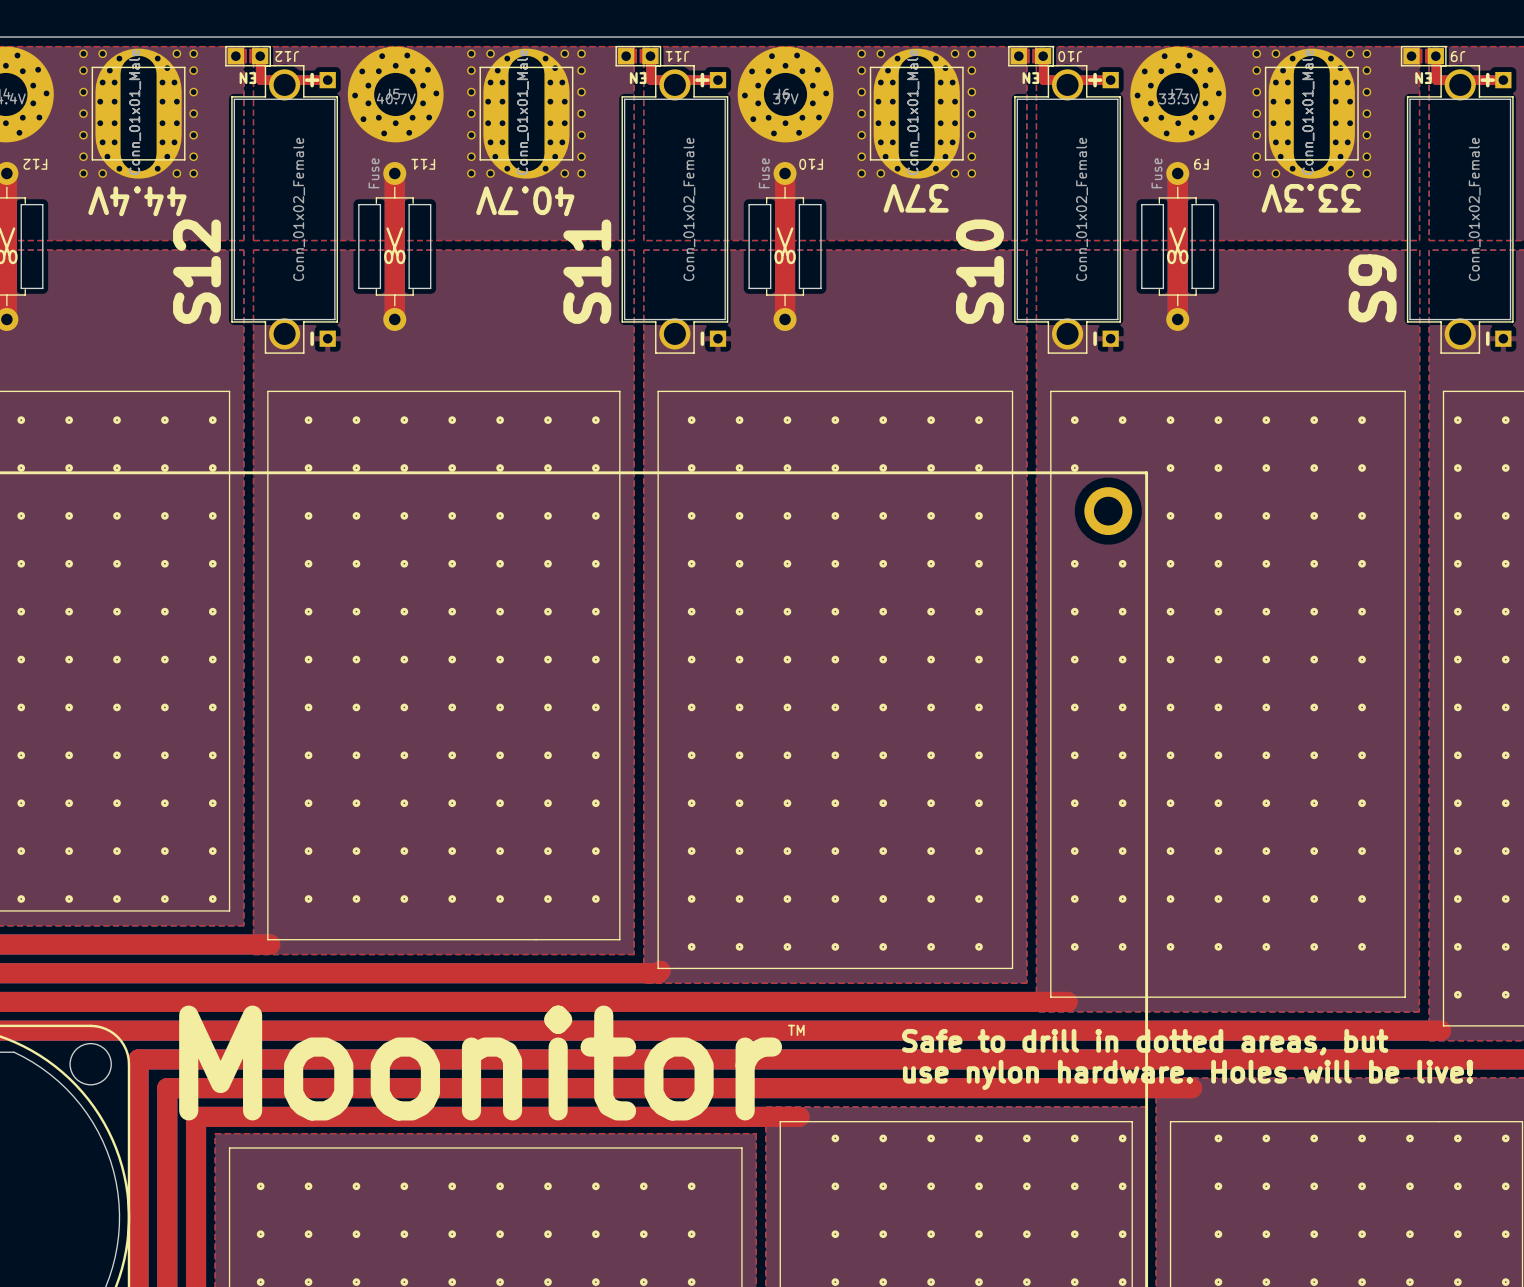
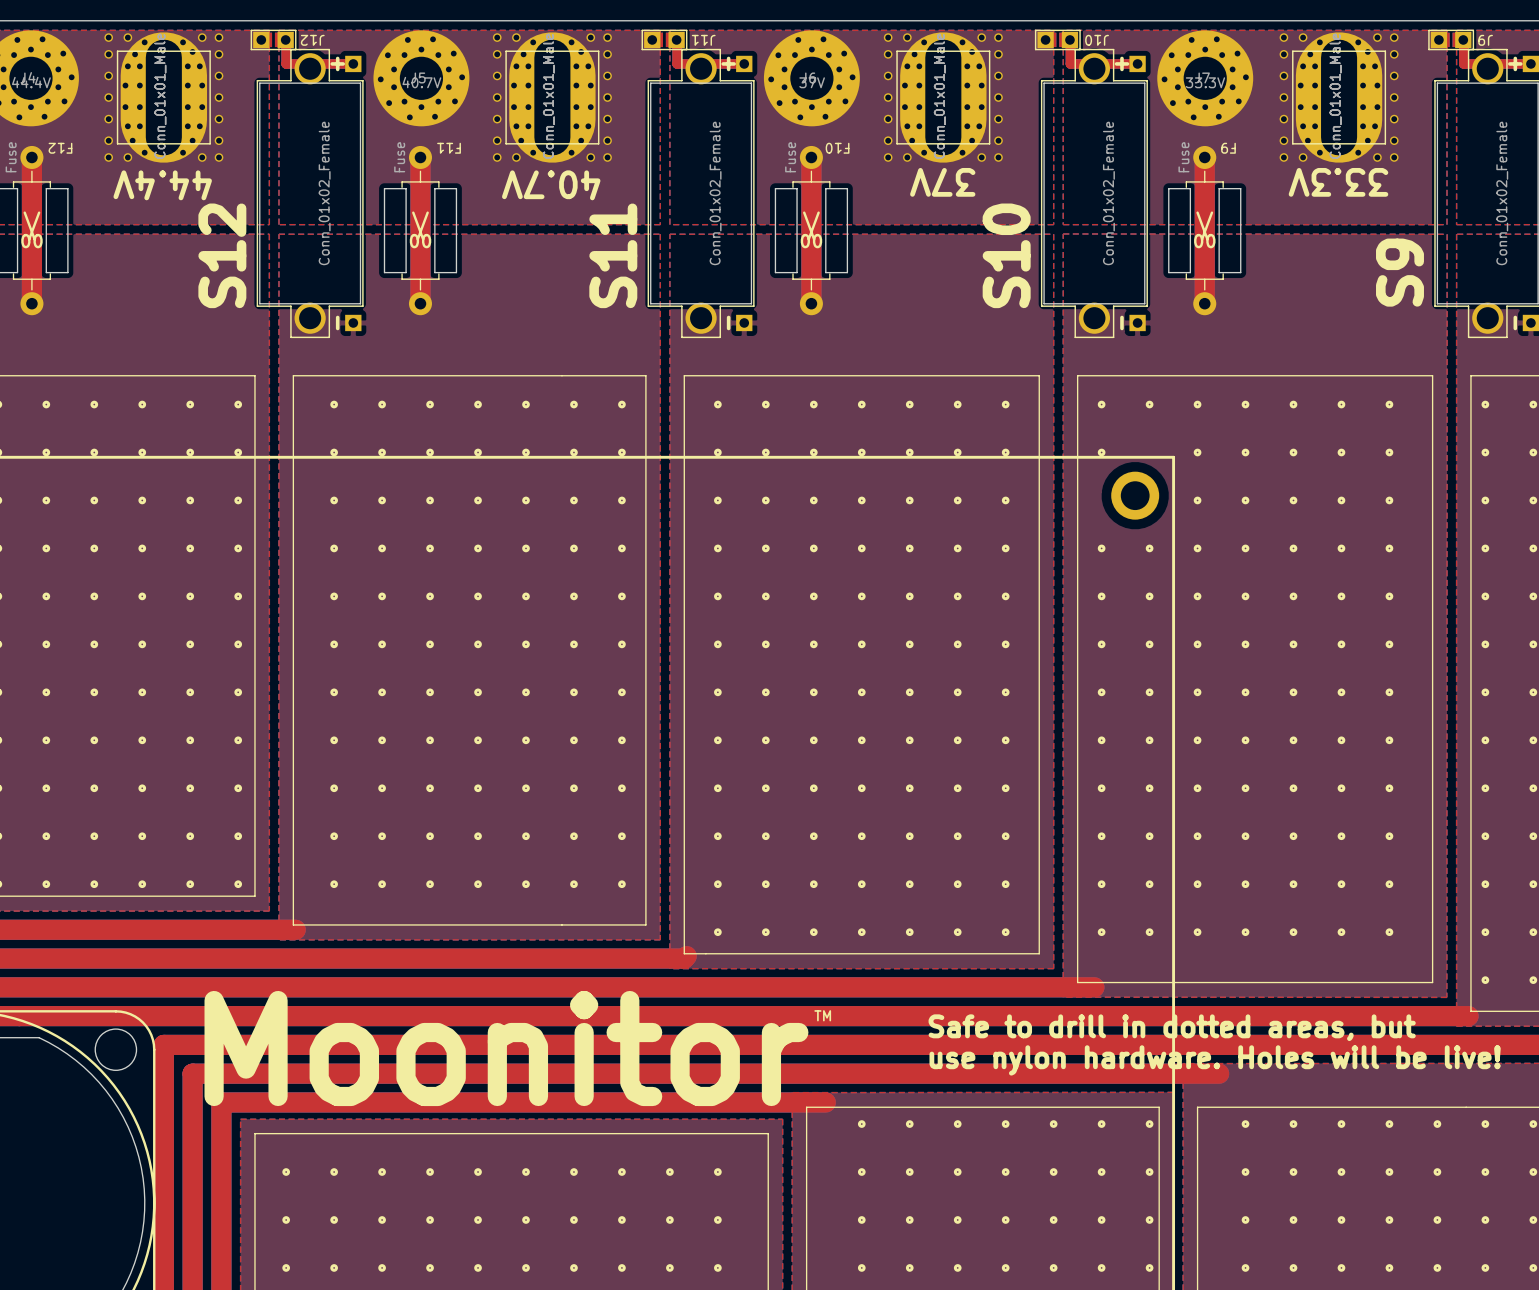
part text: EN (247, 78) -> none
part text: EN (638, 78) -> none
part text: EN (1030, 78) -> none
part text: EN (1423, 78) -> none

